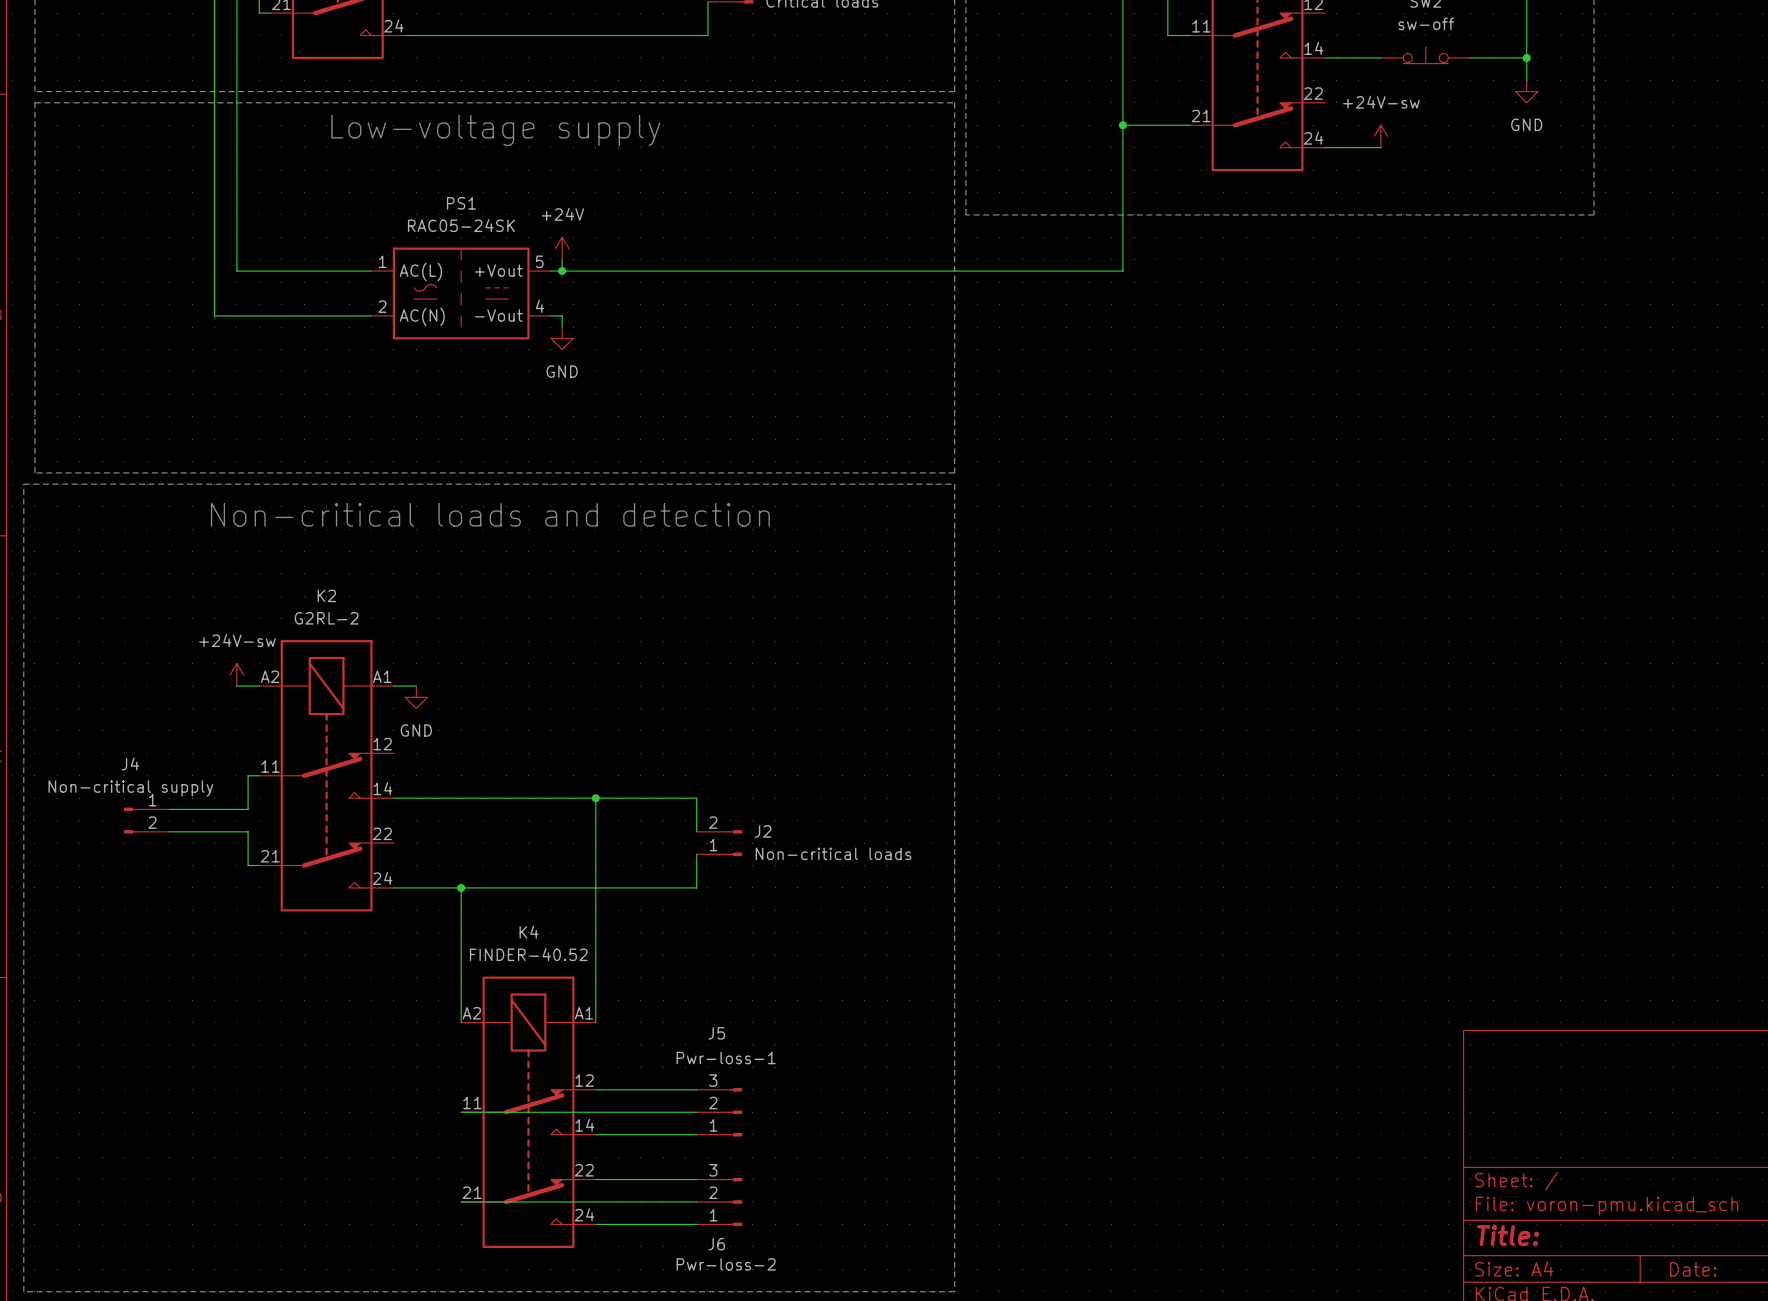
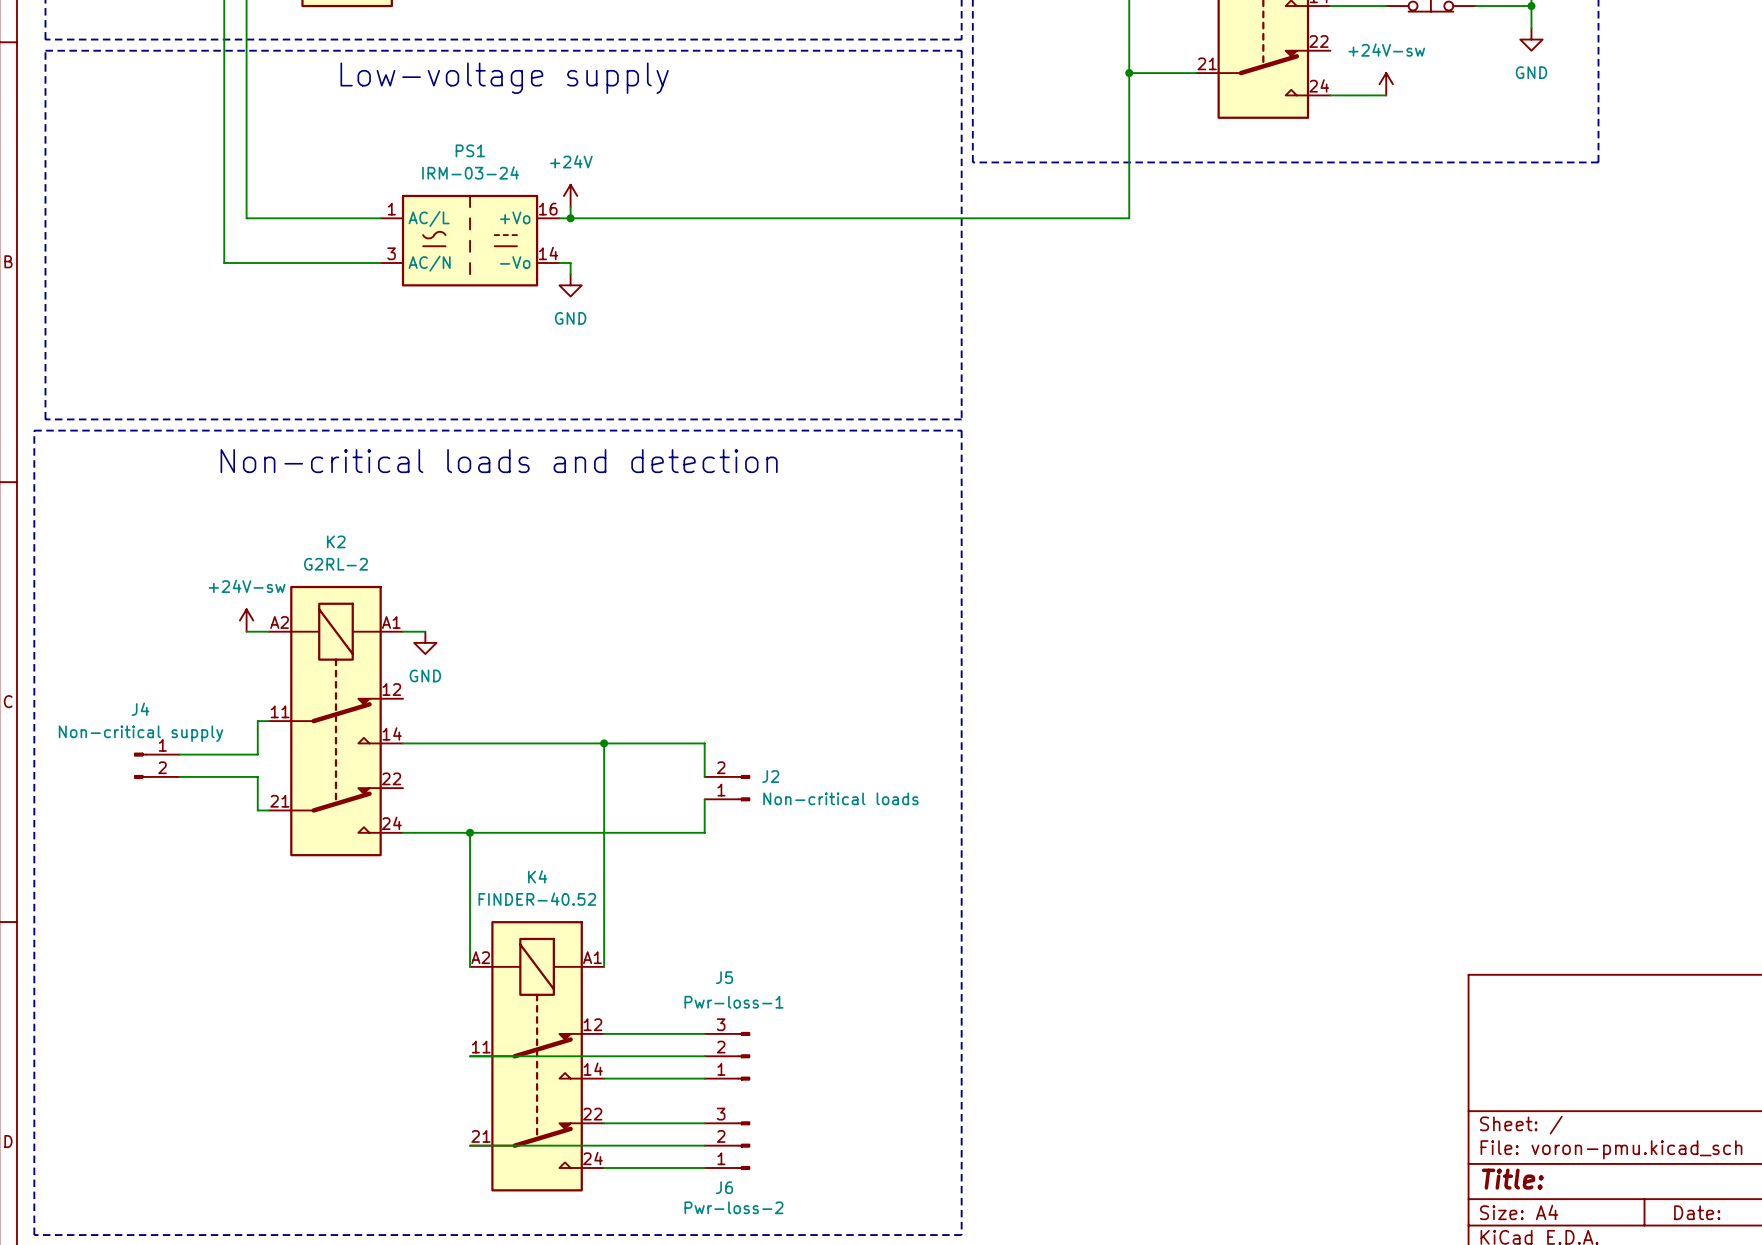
PS1 value: RAC05-24SK (461, 225) -> IRM-03-24 (470, 172)
PS1 pin number: 5 (539, 261) -> 16 (548, 209)
PS1 pin name: +Vout (498, 270) -> +Vo (515, 217)
PS1 pin name: AC(L) (420, 271) -> AC/L (429, 218)
PS1 pin number: 2 (382, 306) -> 3 (391, 253)
PS1 pin number: 4 (539, 306) -> 14 (548, 253)
PS1 pin name: -Vout (498, 315) -> -Vo (515, 262)
PS1 pin name: AC(N) (422, 316) -> AC/N (429, 263)

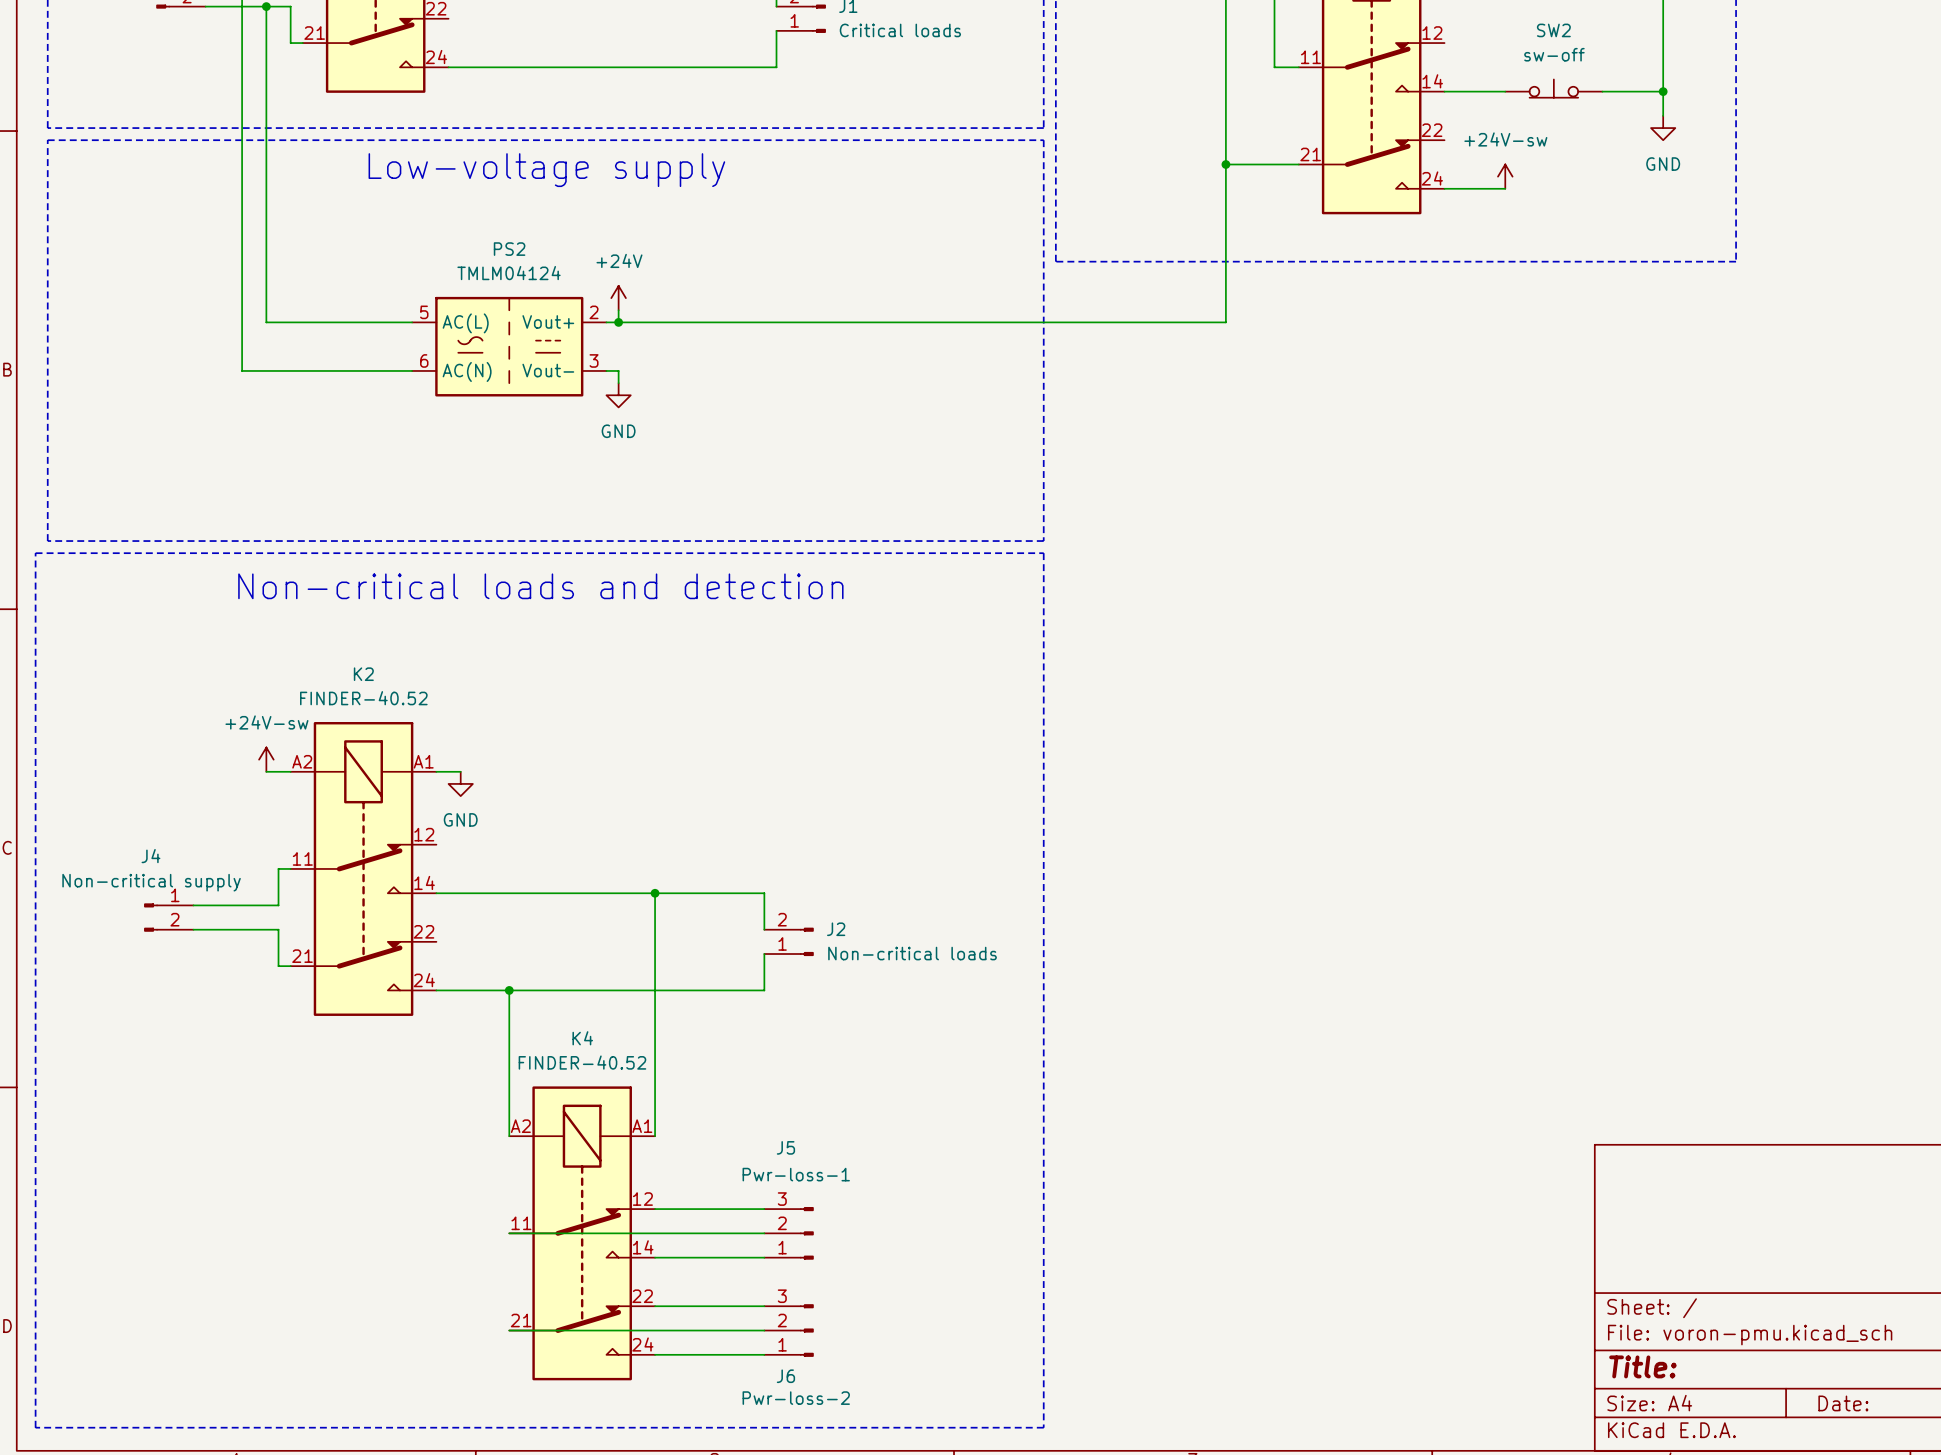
PS1 name: PS1 (470, 150) -> PS2 (509, 249)
PS1 value: IRM-03-24 (470, 172) -> TMLM04124 (509, 273)
PS1 pin number: 1 (391, 209) -> 5 (424, 312)
PS1 pin number: 16 (548, 209) -> 2 (594, 312)
PS1 pin name: +Vo (515, 217) -> Vout+ (548, 321)
PS1 pin name: AC/L (429, 218) -> AC(L) (465, 323)
PS1 pin number: 3 (391, 253) -> 6 (424, 360)
PS1 pin number: 14 (548, 253) -> 3 (594, 360)
PS1 pin name: -Vo (515, 262) -> Vout- (548, 370)
PS1 pin name: AC/N (429, 263) -> AC(N) (467, 371)
K2 value: G2RL-2 (335, 564) -> FINDER-40.52 (363, 698)

